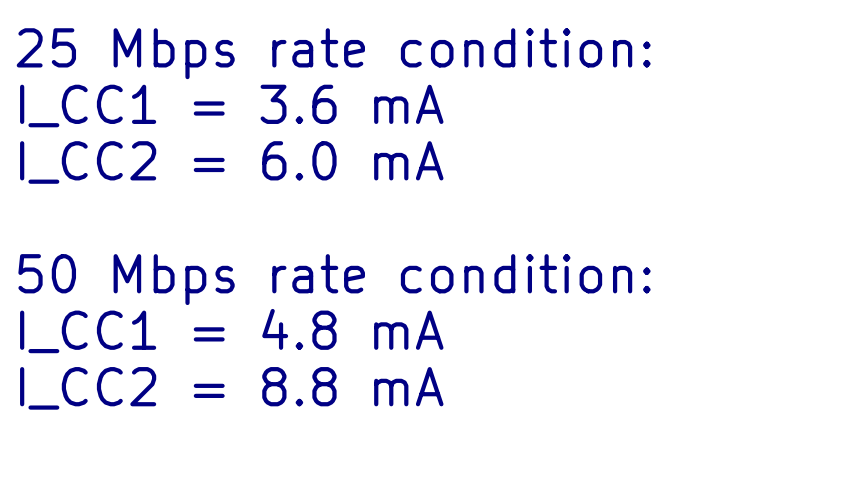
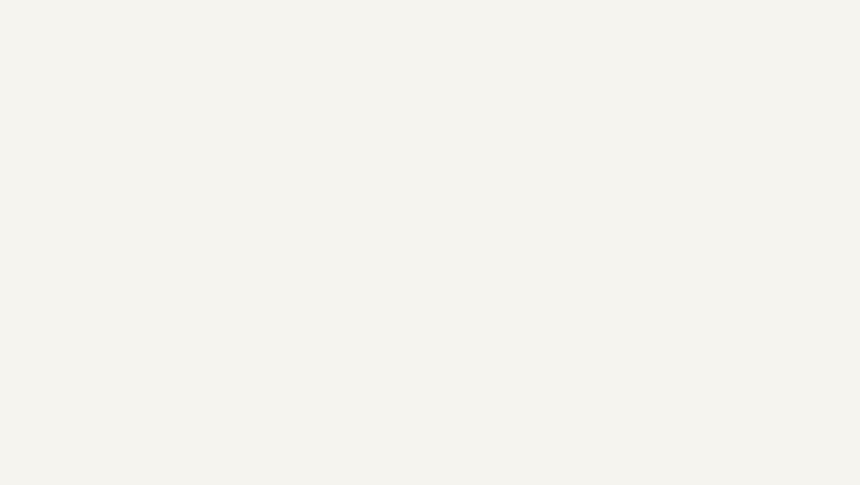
text: 25 Mbps rate condition: (333, 53) -> none
text: I_CC1 = 3.6 mA (231, 106) -> none
text: I_CC2 = 6.0 mA (231, 162) -> none
text: 50 Mbps rate condition: (334, 279) -> none
text: I_CC1 = 4.8 mA (231, 331) -> none
text: I_CC2 = 8.8 mA (231, 388) -> none

